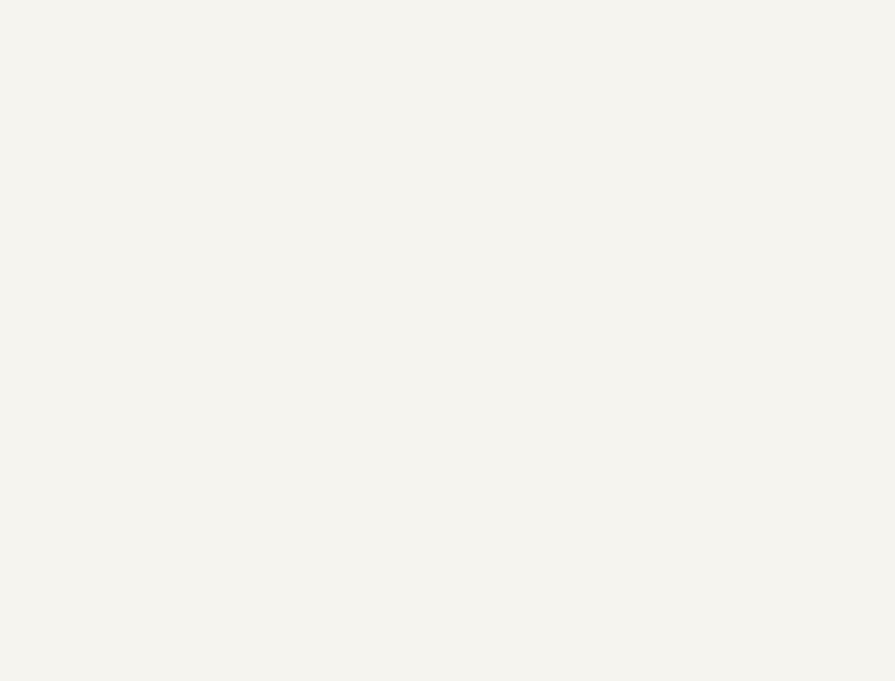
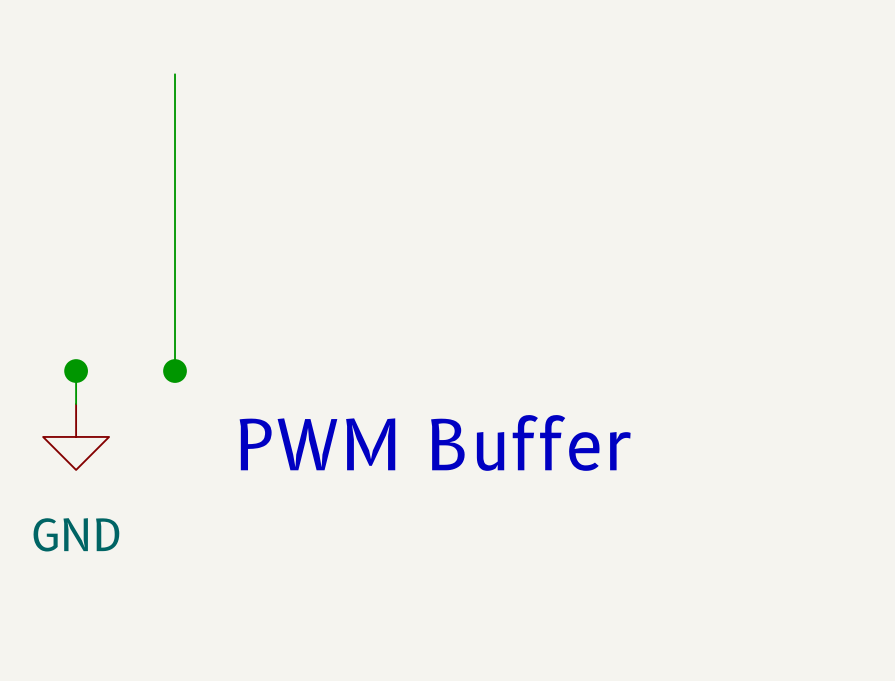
wire: none -> (175, 74) (175, 371)
wire: none -> (76, 371) (76, 404)
junction: none -> (76, 371)
junction: none -> (175, 371)
power symbol: none -> GND (76, 436)
text: none -> PWM Buffer (435, 442)

